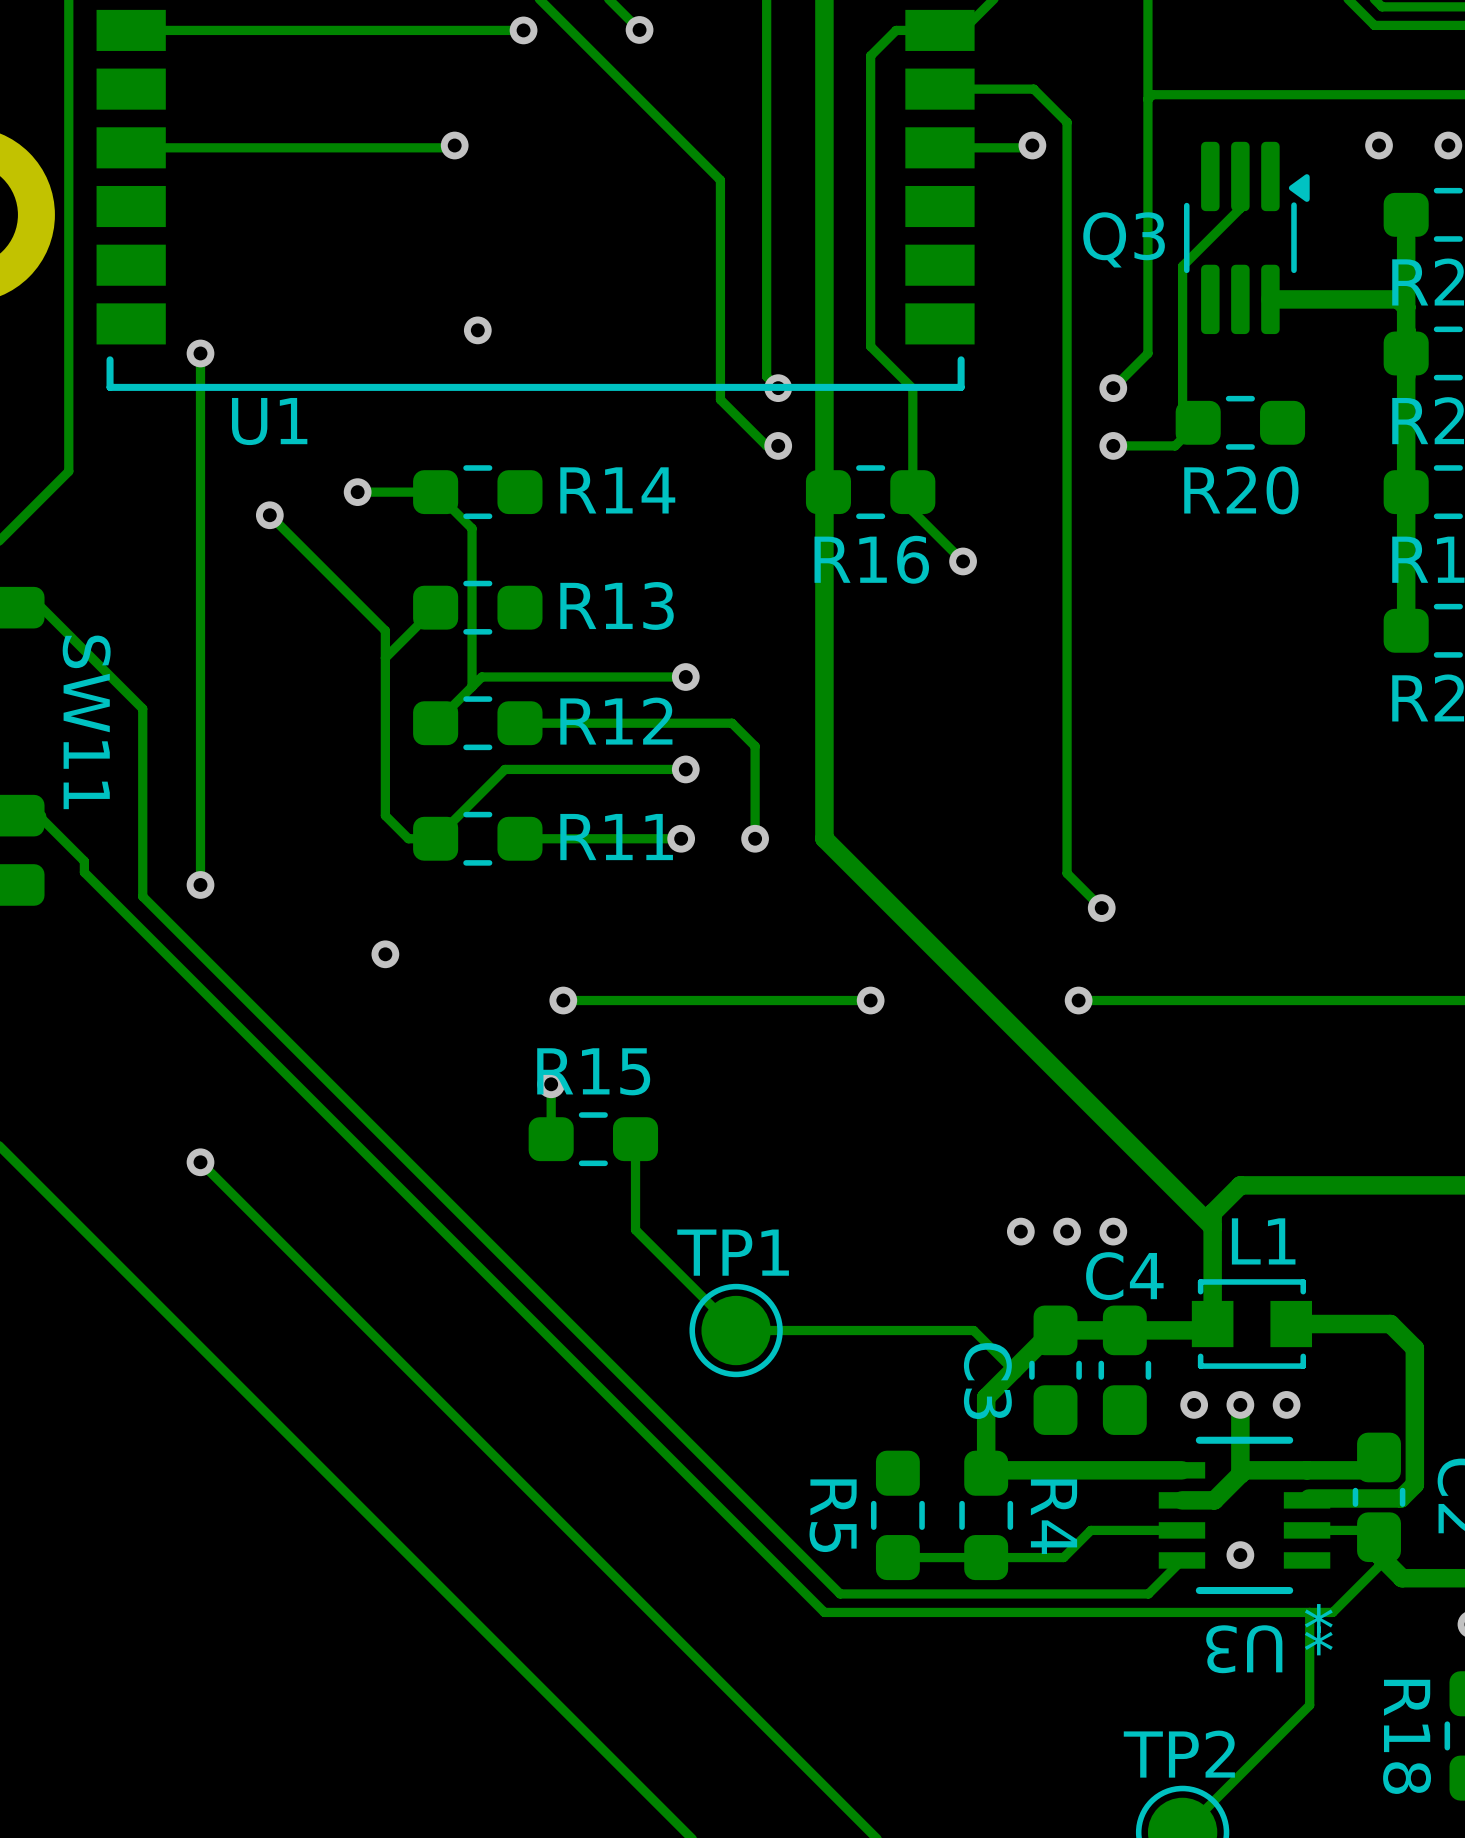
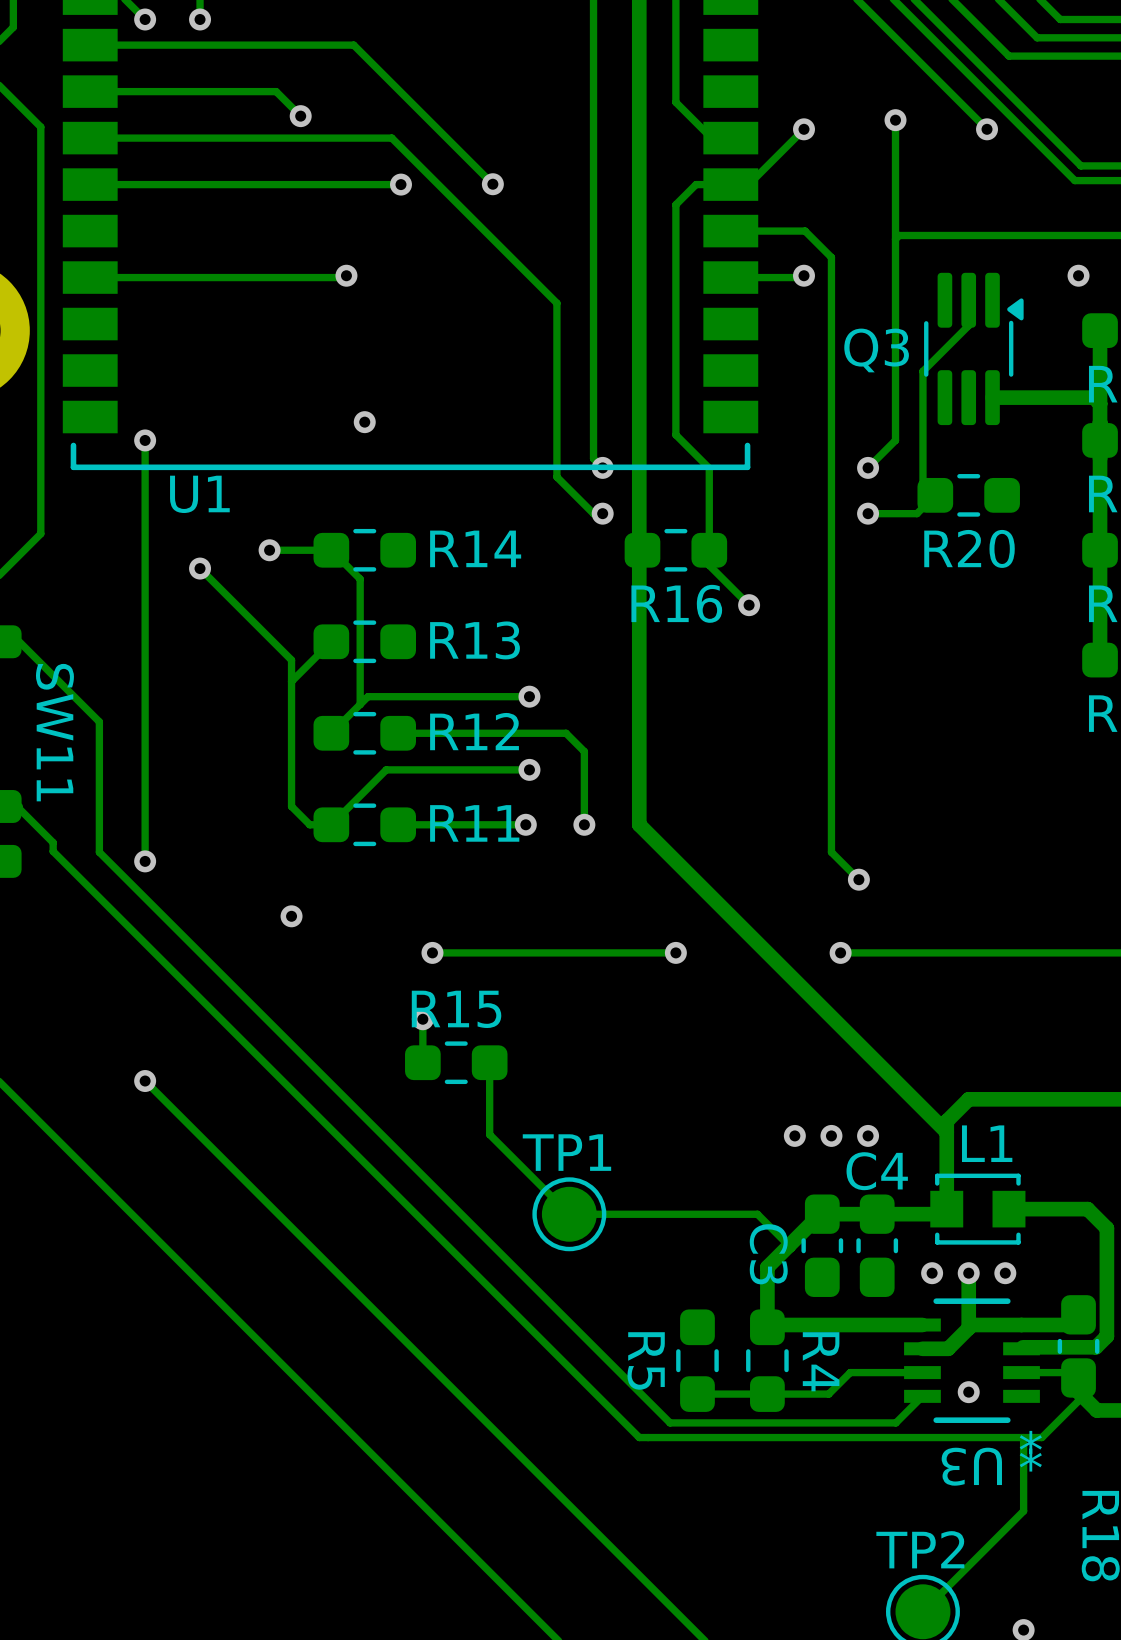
track: (142, 873) (142, 896) (840, 1593) (863, 1593) -> (99, 852) (670, 1422)

